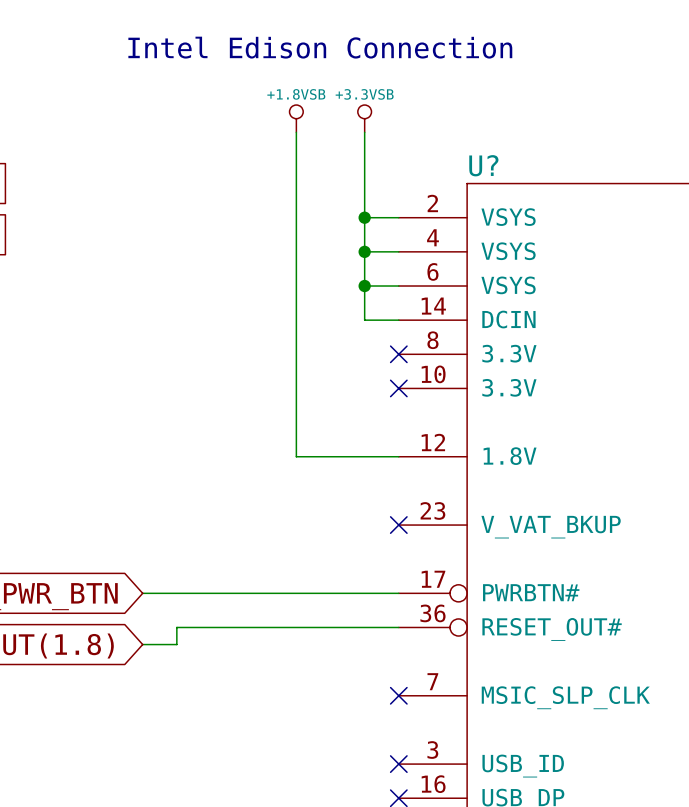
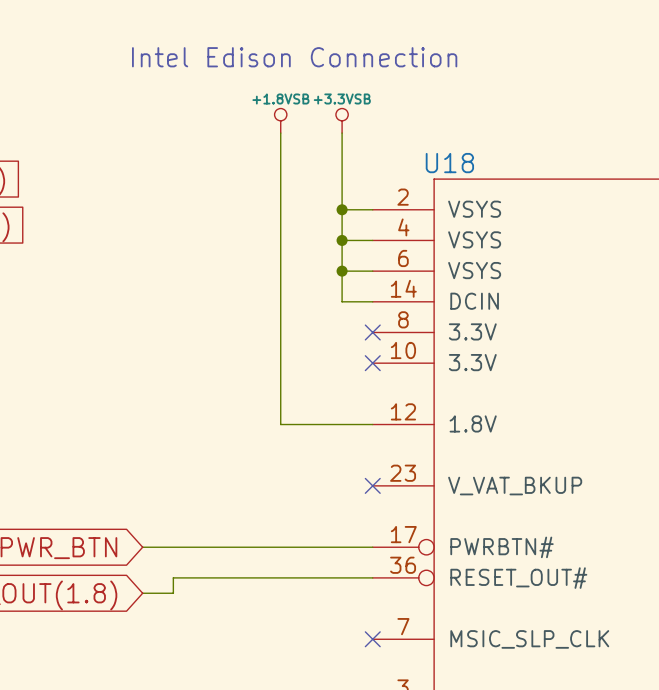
U? name: U? (483, 165) -> U18 (449, 163)

